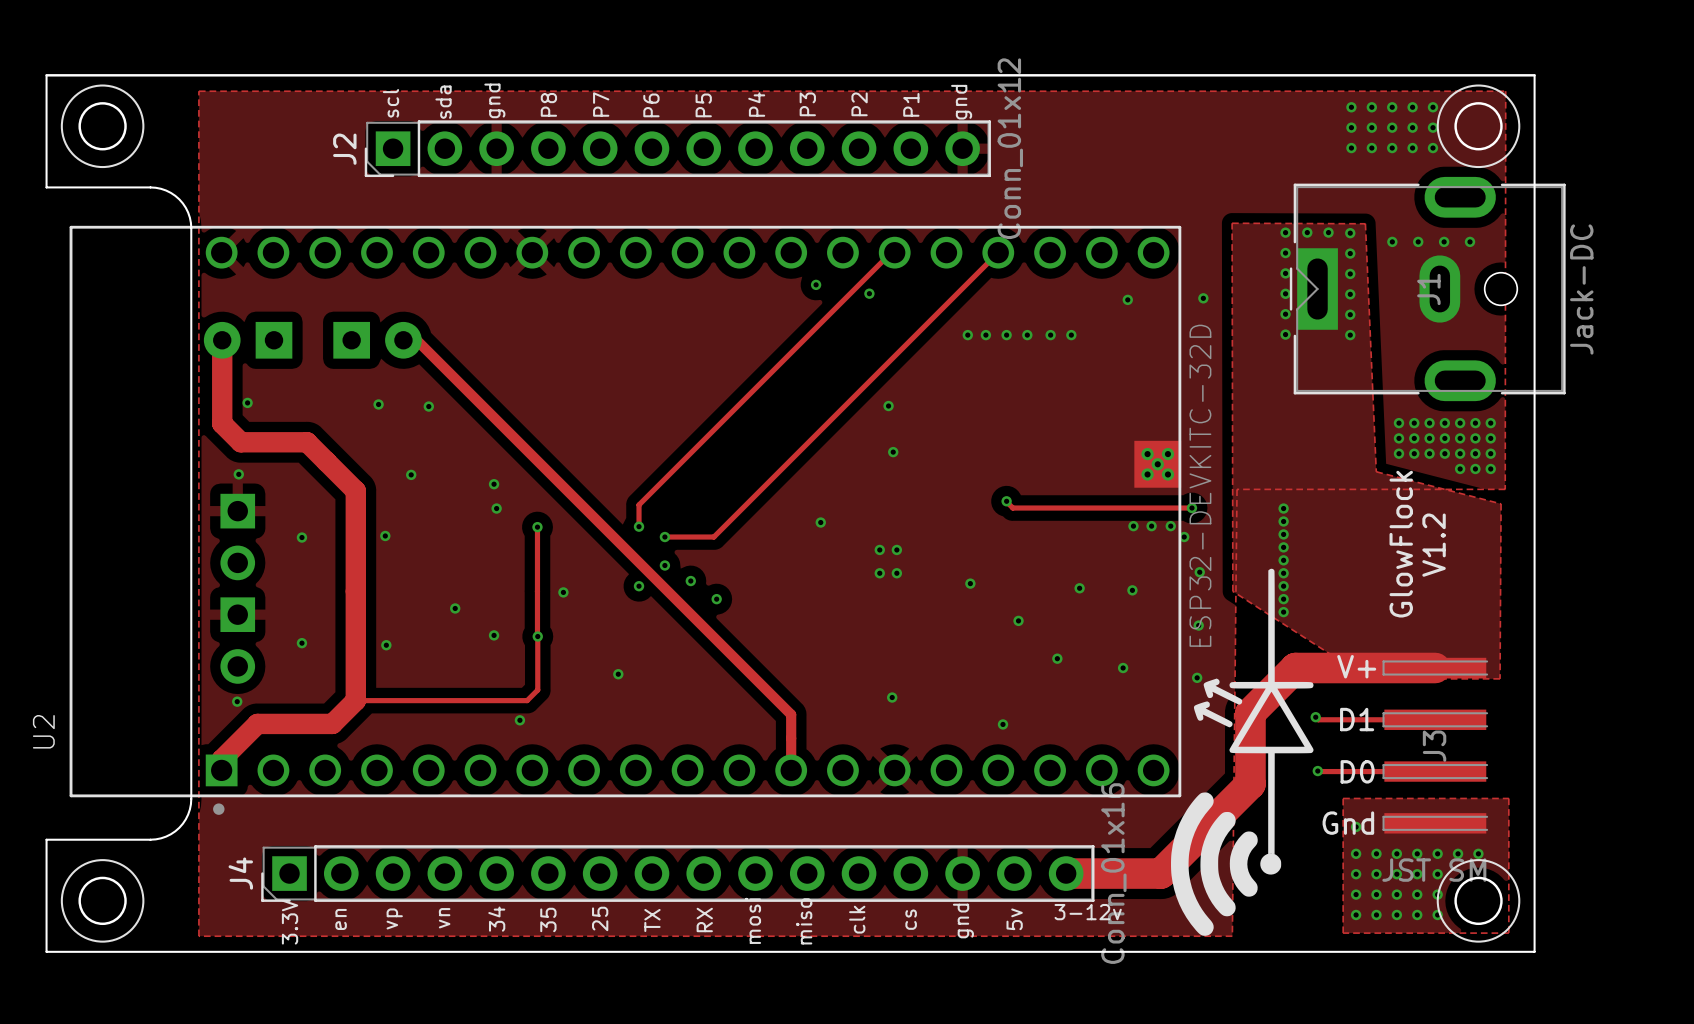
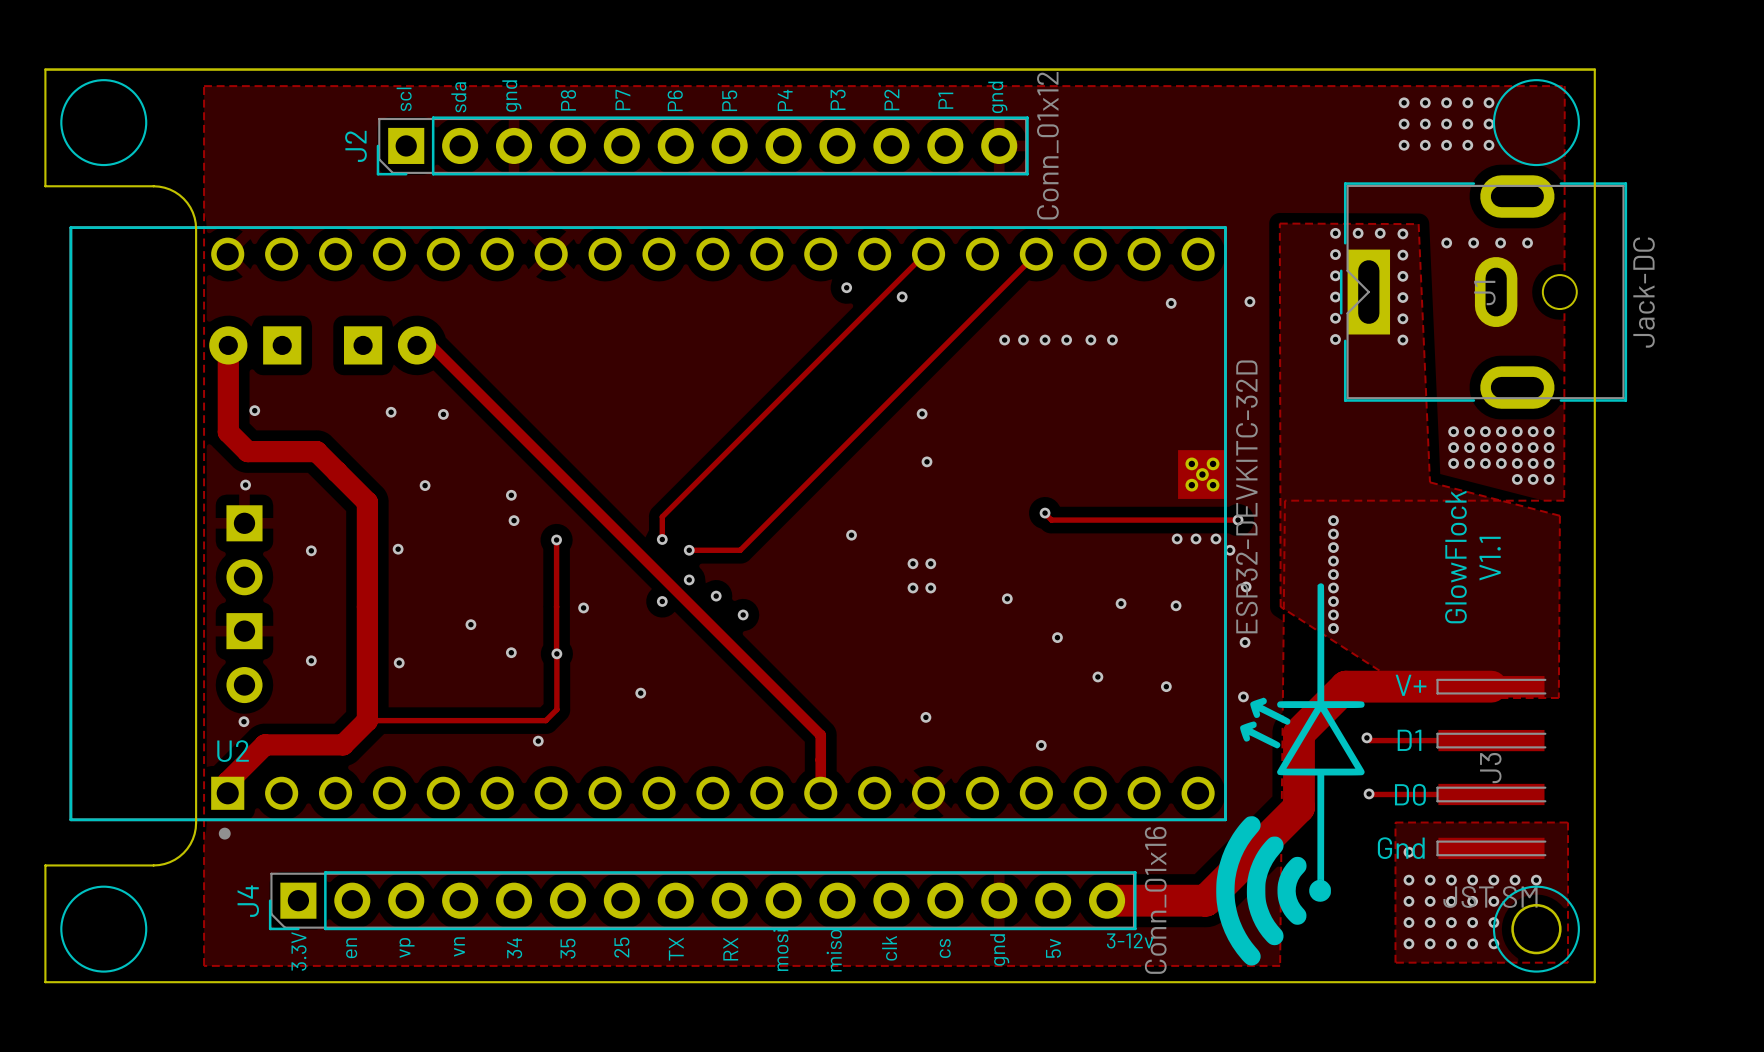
round board edge: [78, 102, 127, 151] -> none
round board edge: [1454, 102, 1503, 151] -> none
text: V1.2 (1434, 545) -> V1.1 (1490, 558)
U2 name rotation: 0° (43, 731) -> 90° clockwise (233, 751)
U2 name position: U2 (43, 731) -> U2 (233, 751)
round board edge: [78, 876, 127, 926] -> none

